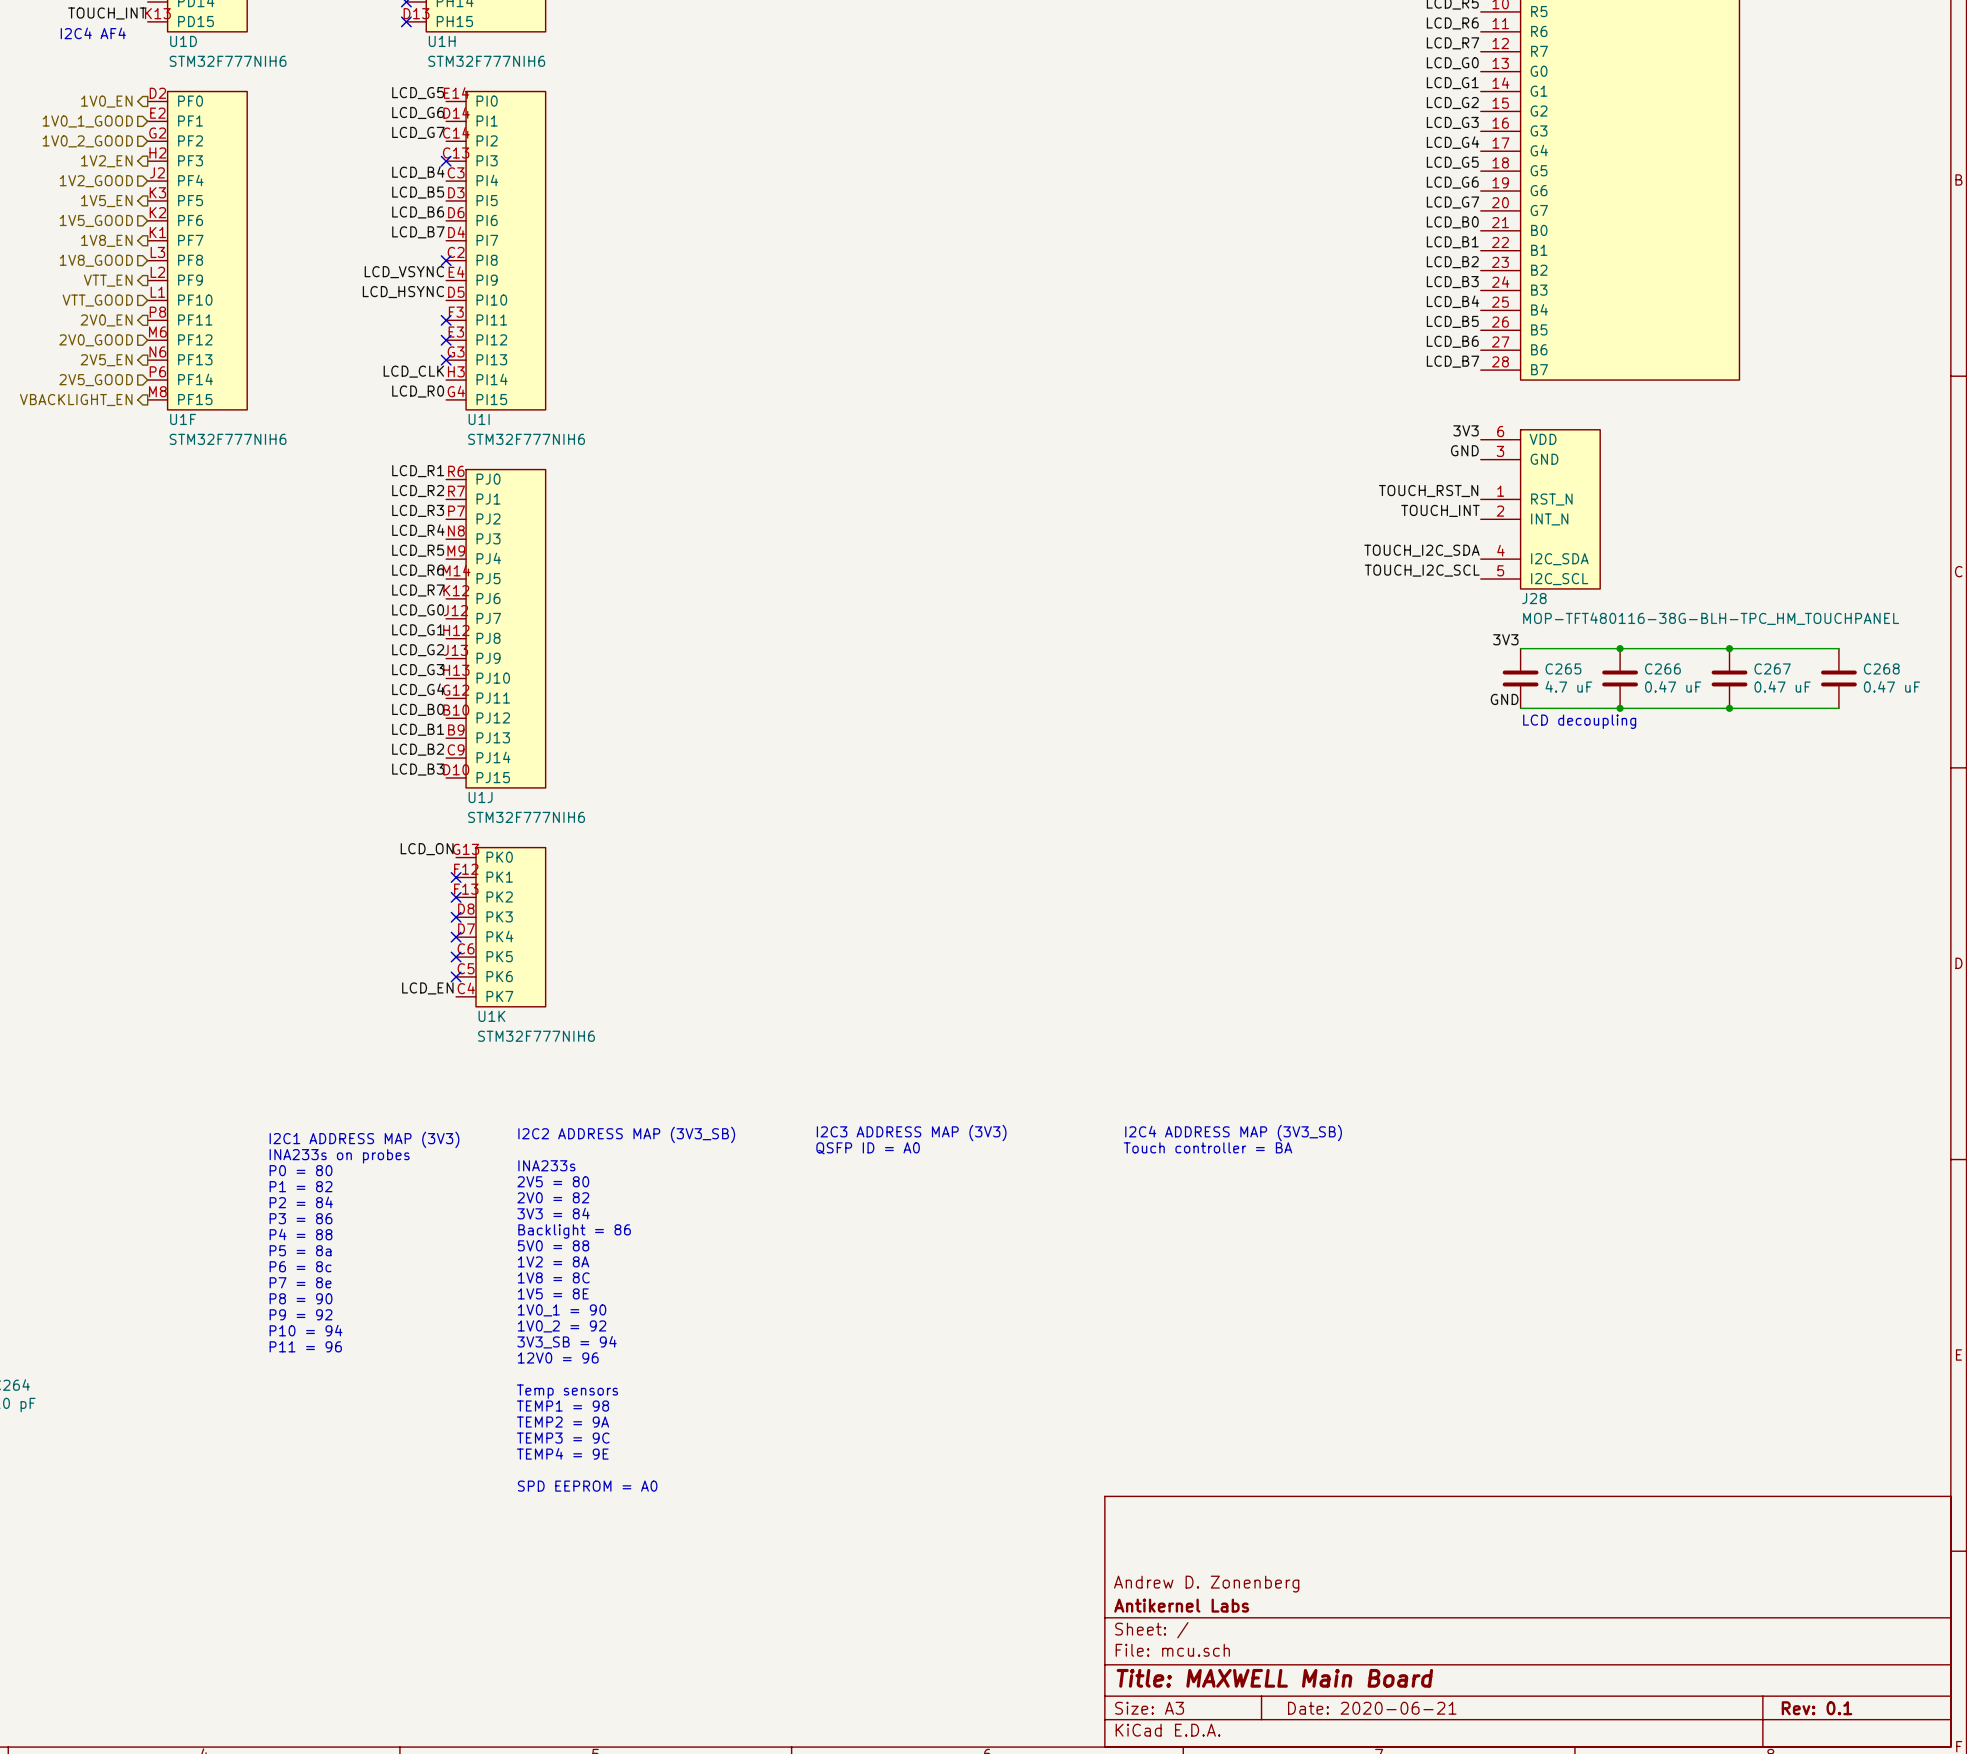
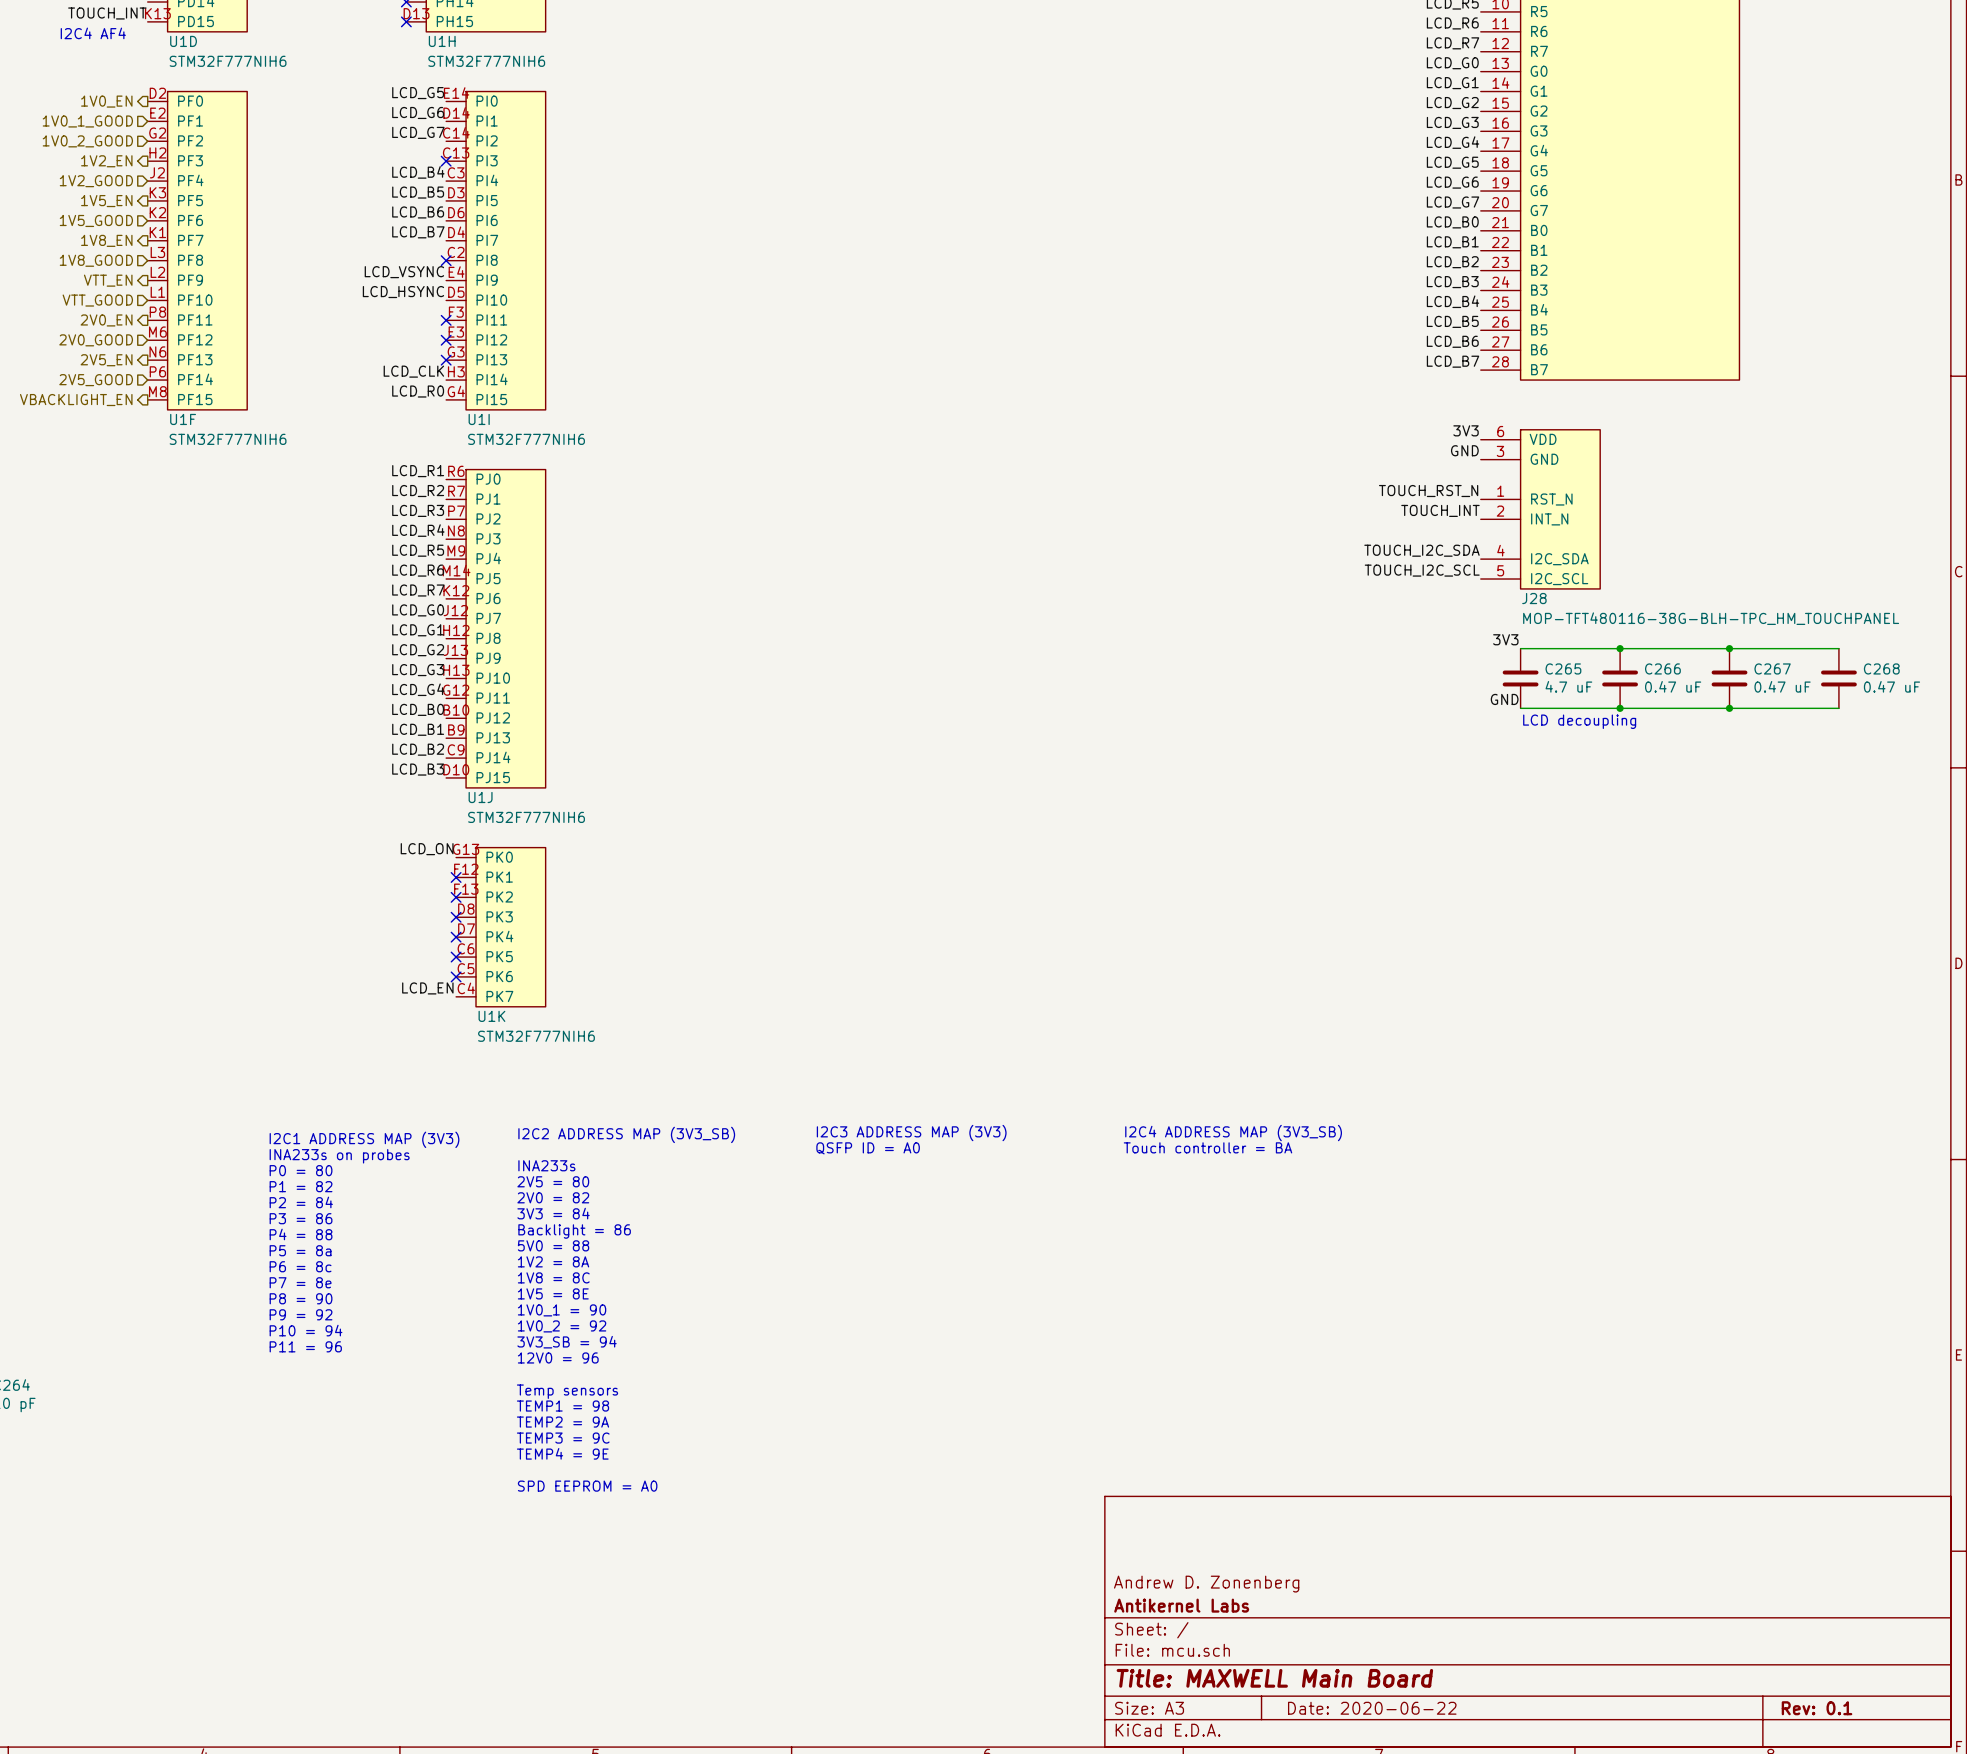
title block: Date: 2020-06-21 (1372, 1708) -> Date: 2020-06-22 (1372, 1708)

